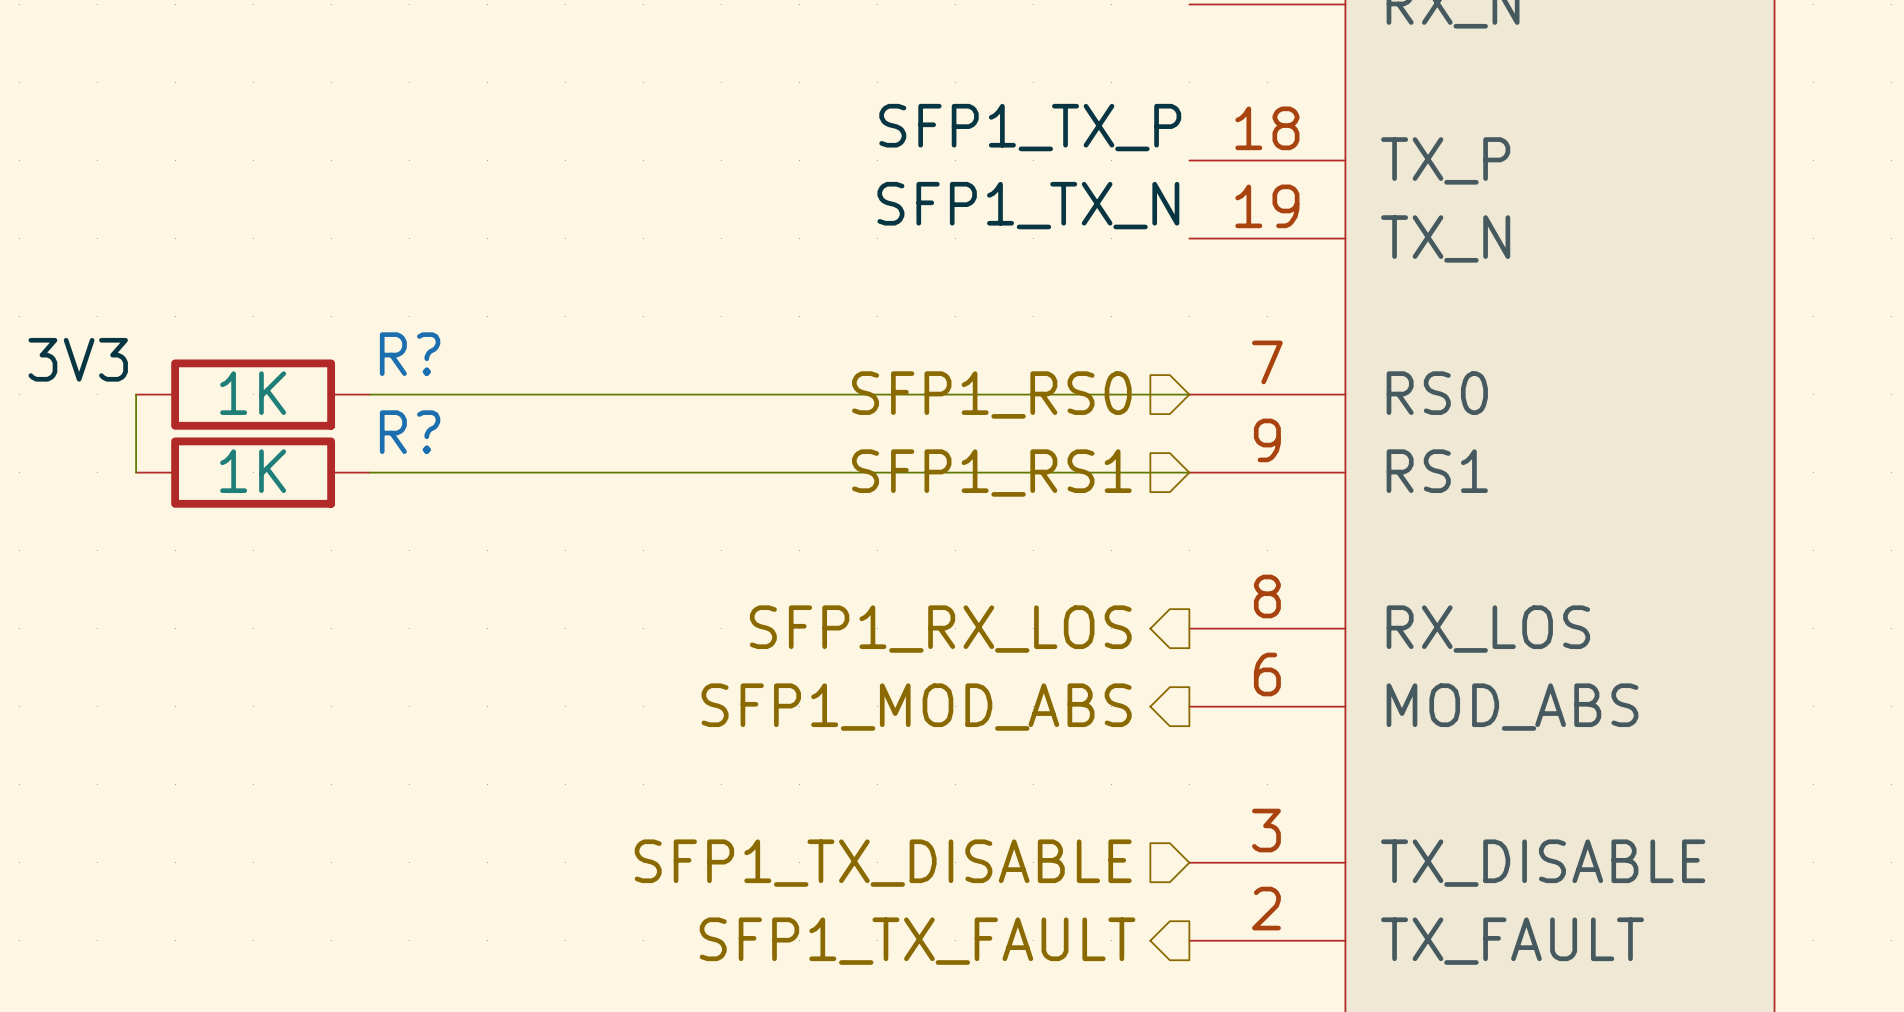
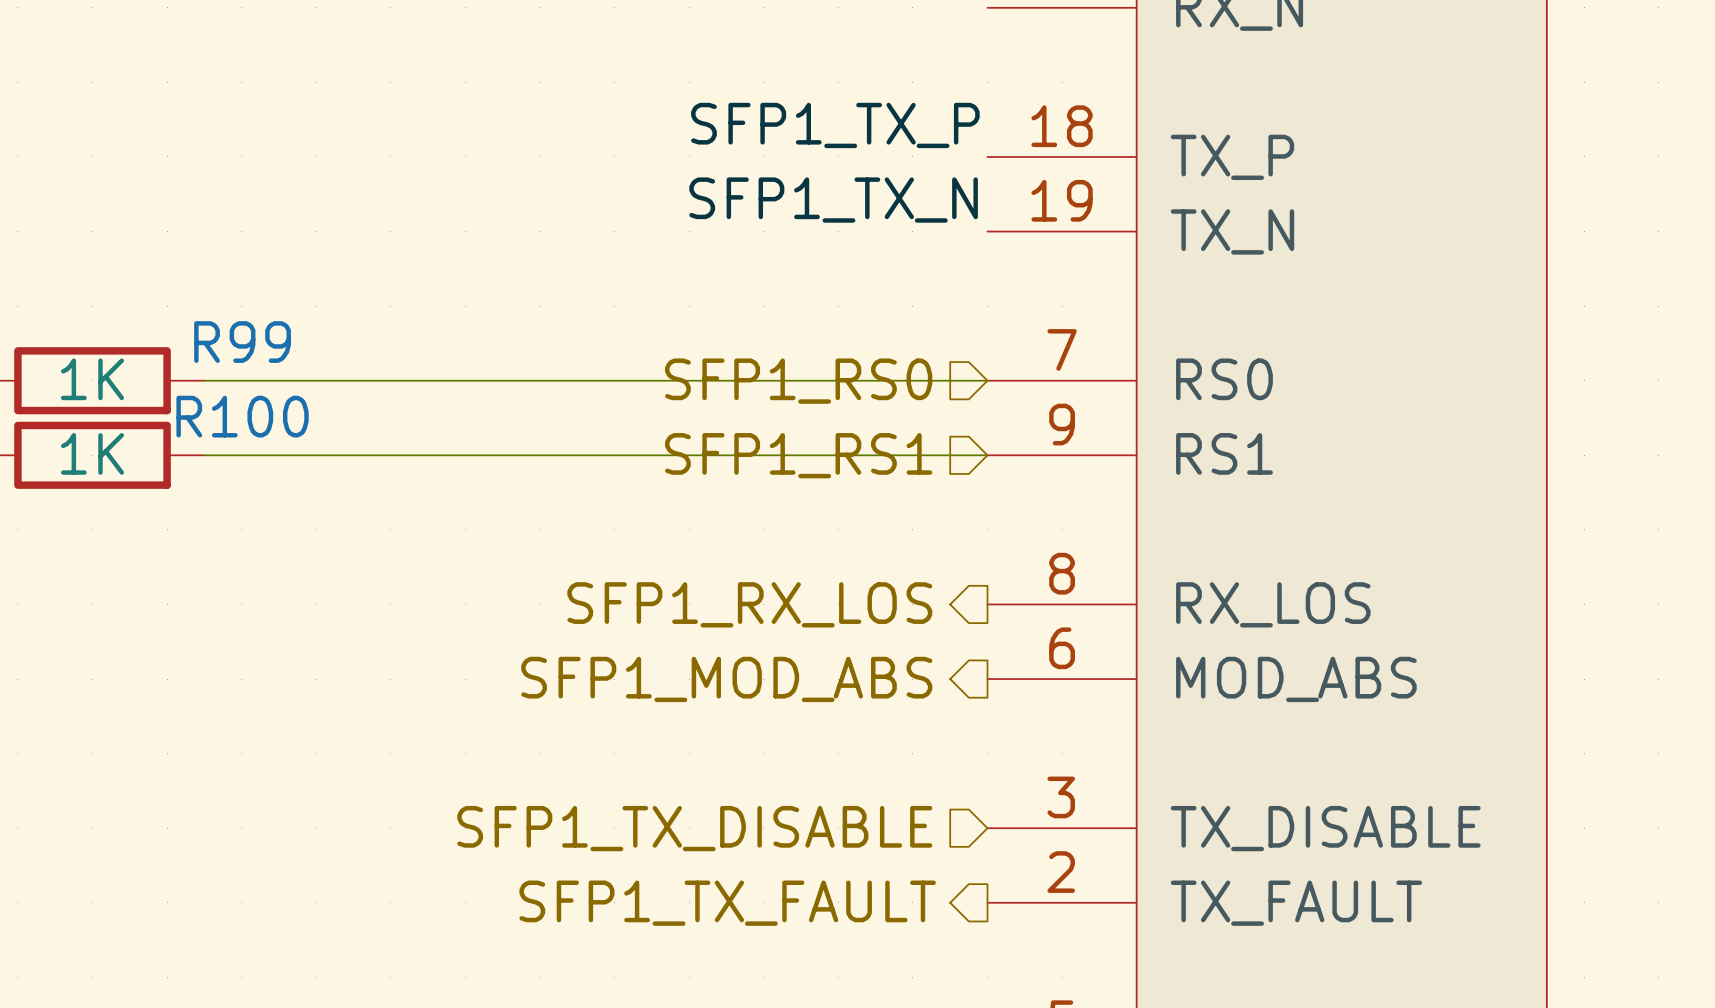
R? name: R? (410, 354) -> R99 (242, 342)
R? name: R? (410, 432) -> R100 (242, 416)

